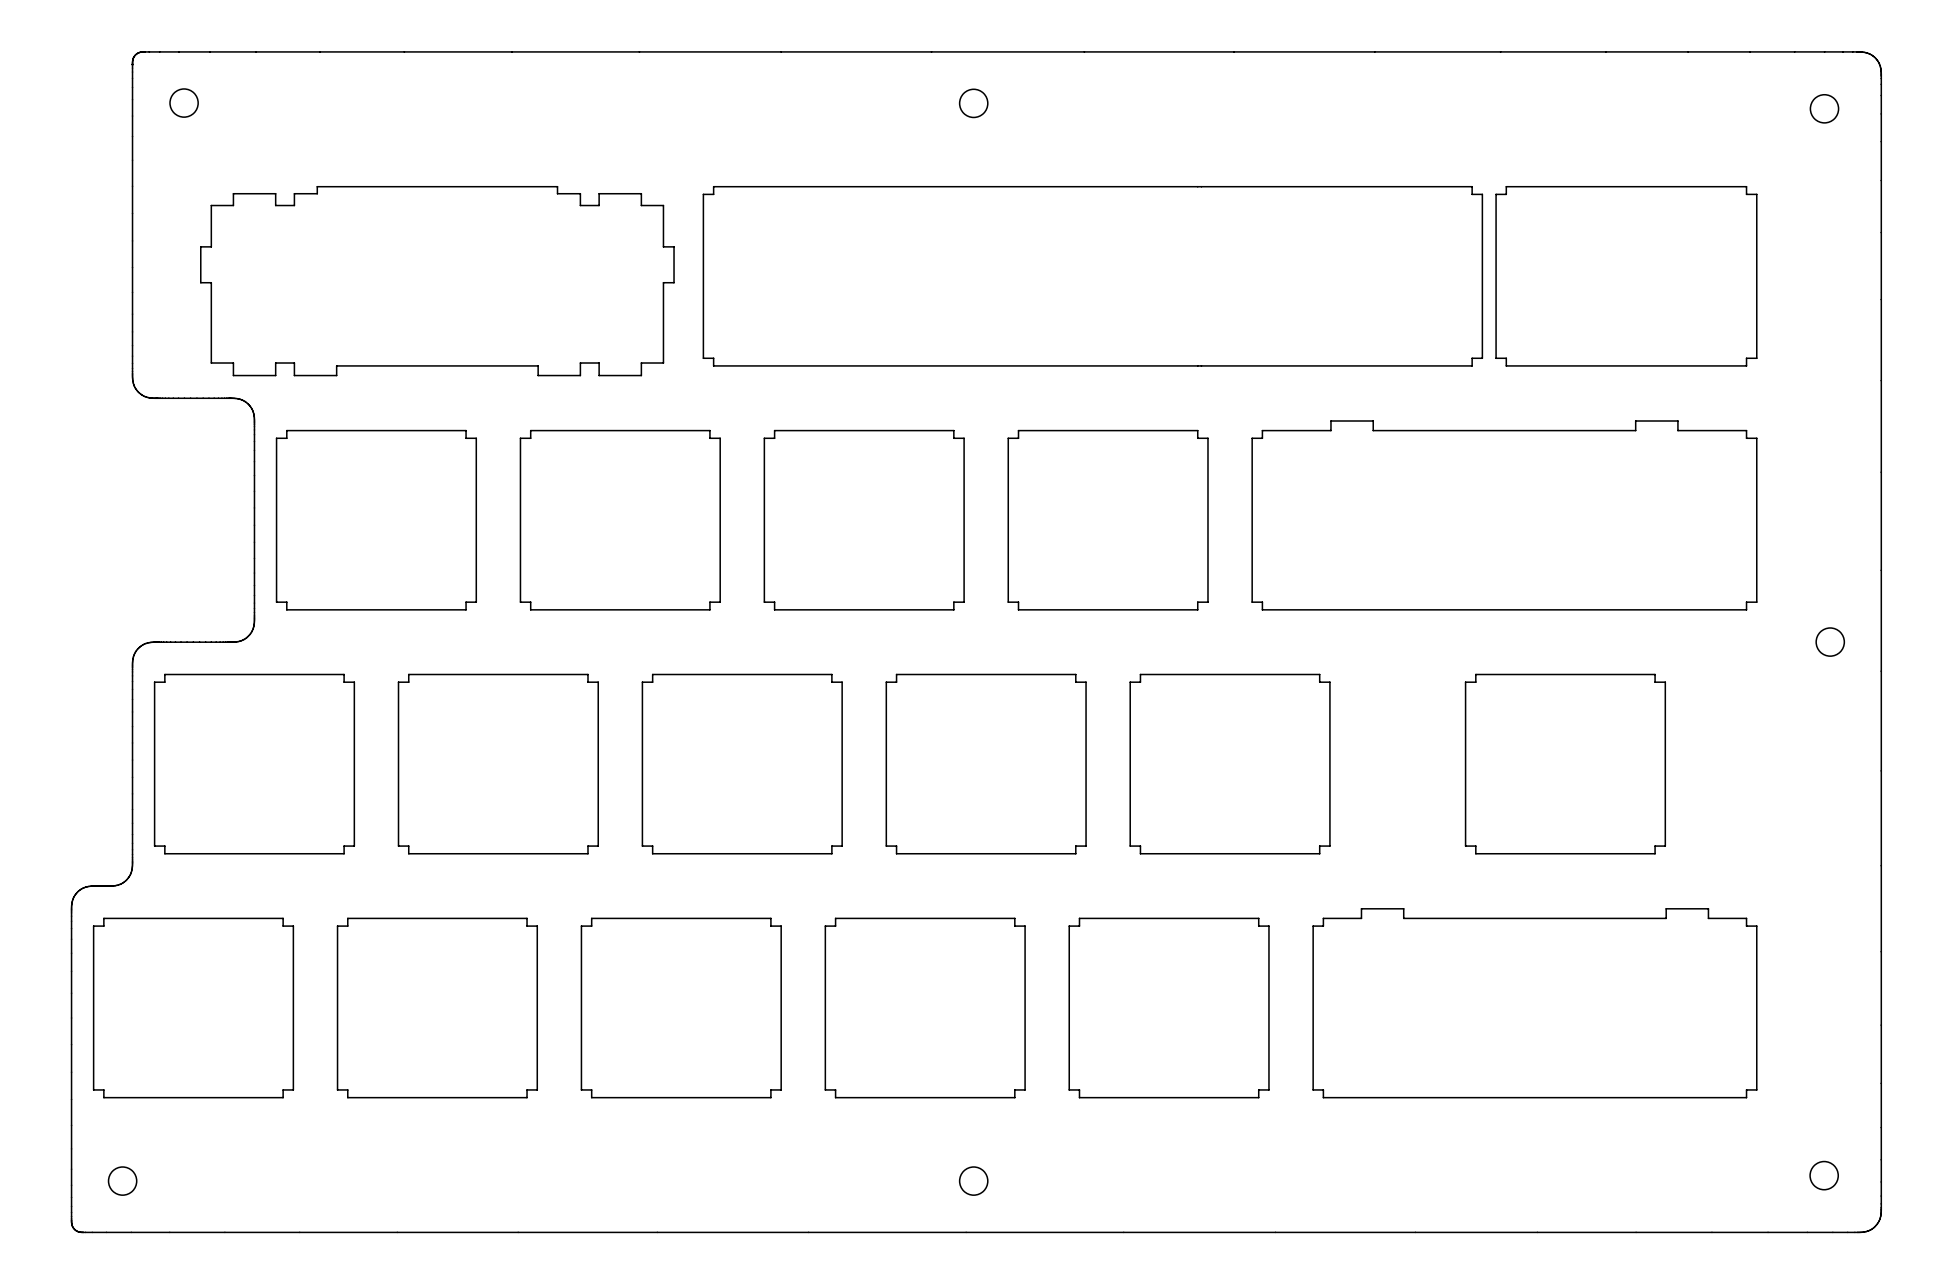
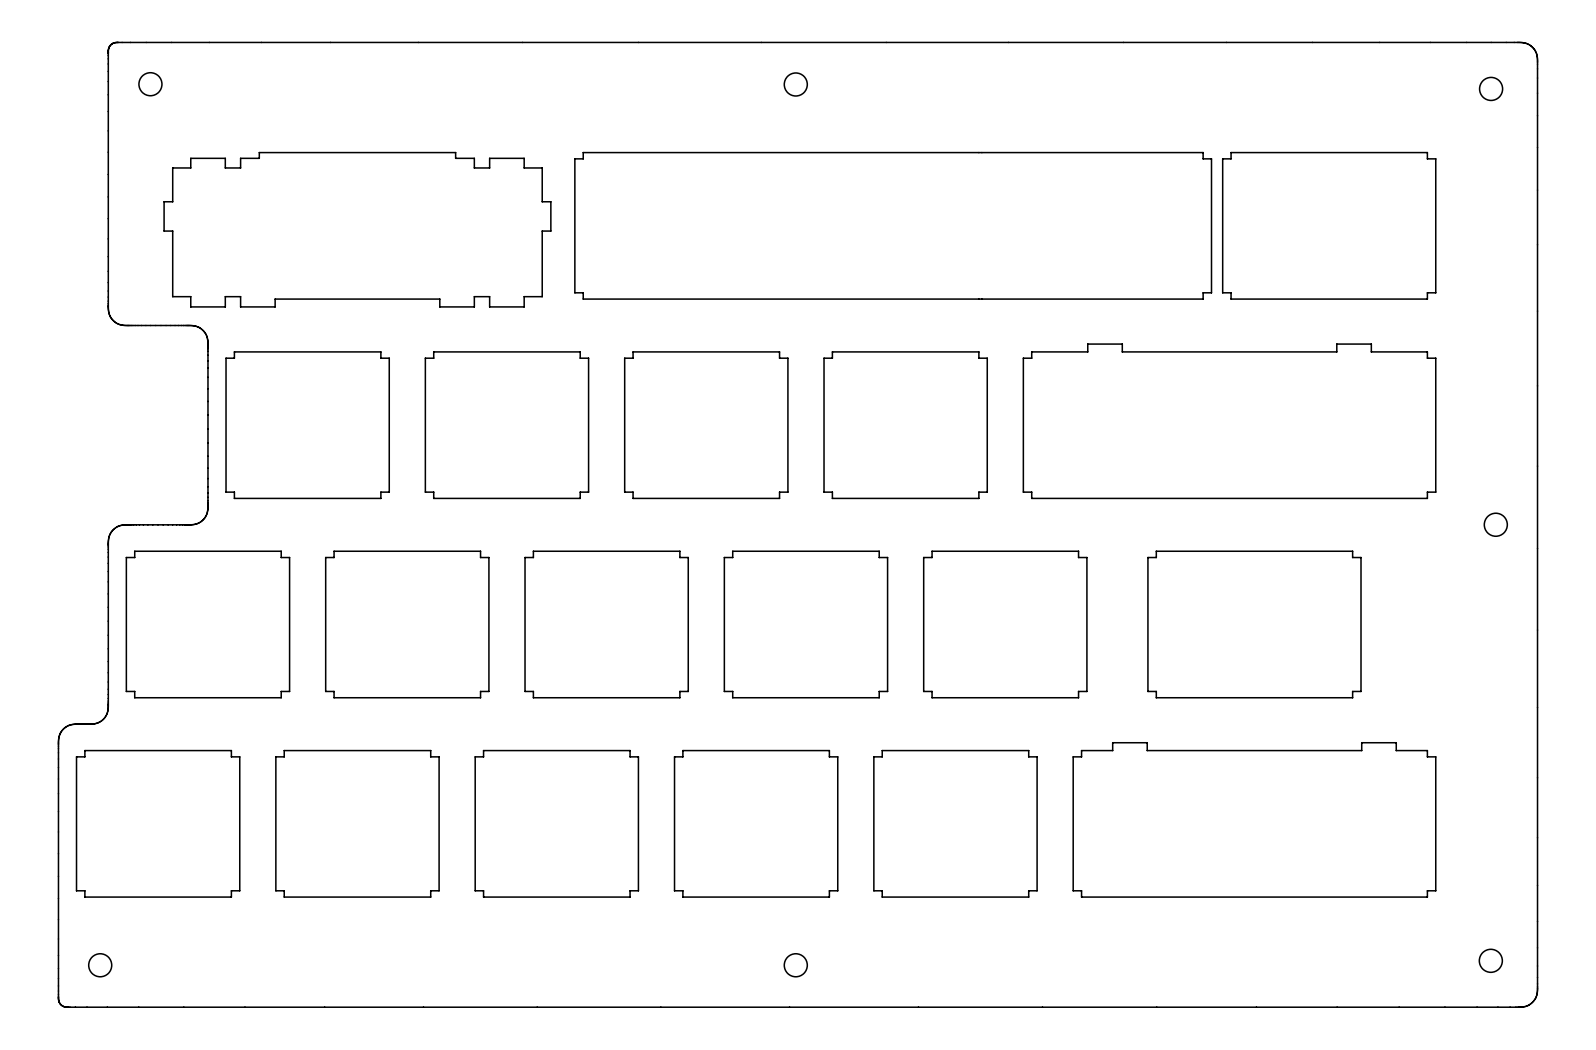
board edge: (1475, 674) (1475, 682) (1465, 682) (1465, 846) (1475, 846) (1475, 853) -> (1206, 551) (1156, 551) (1156, 557) (1147, 557) (1147, 691) (1156, 691) (1156, 697) (1206, 697)

